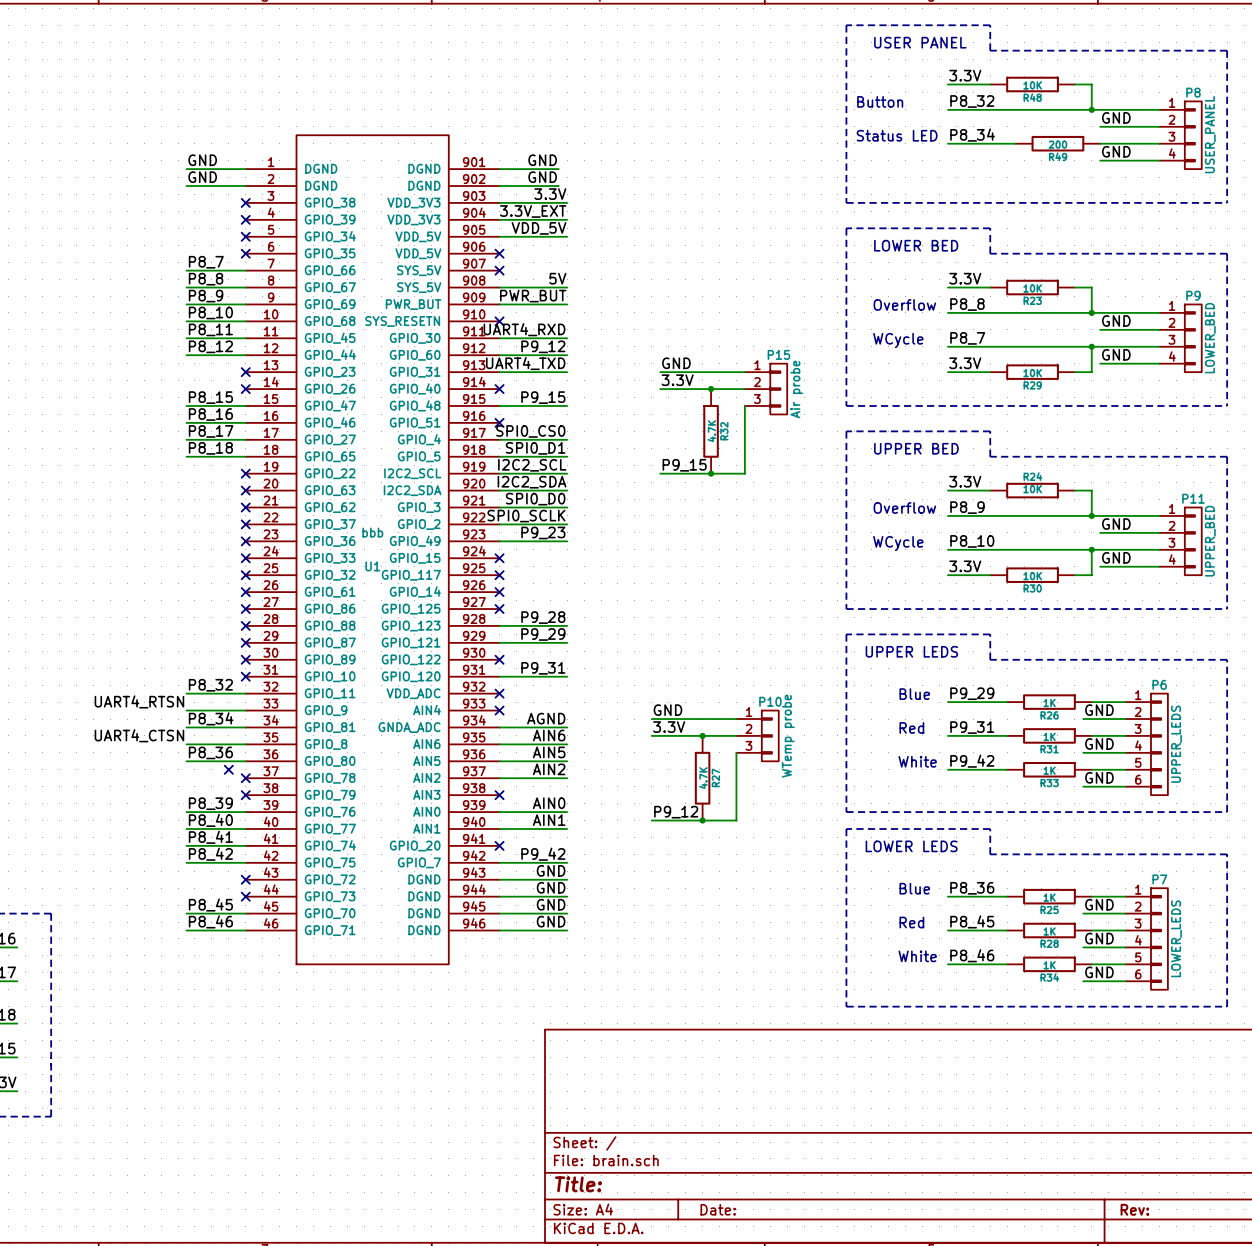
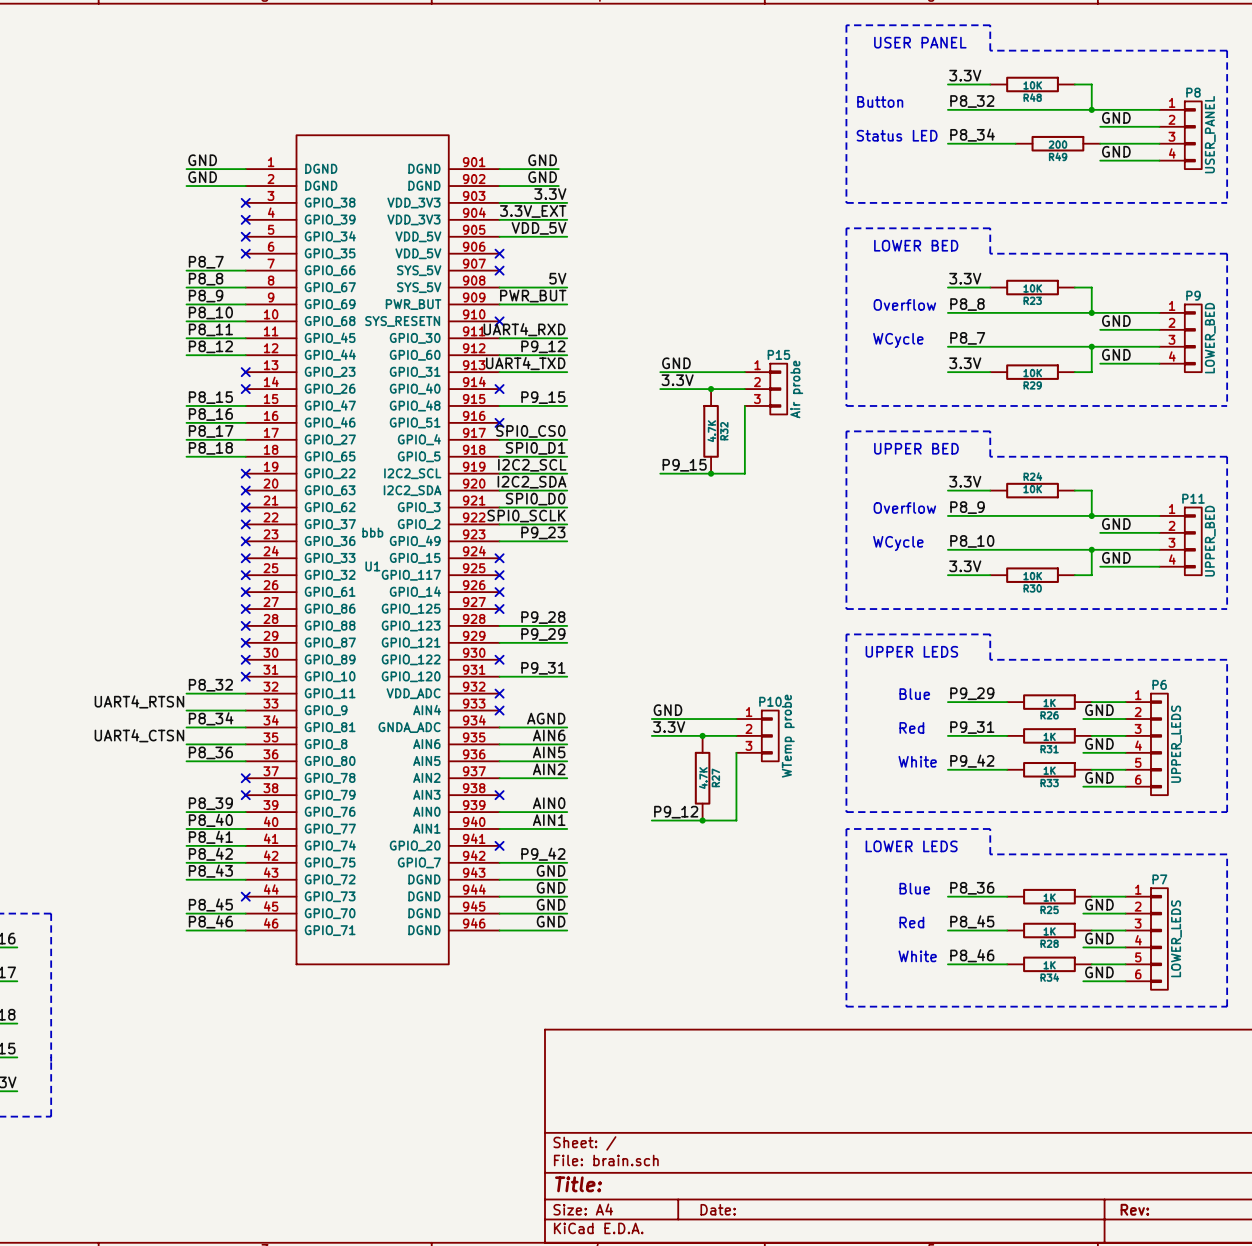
no-connect mark: (228, 769) -> none
label: none -> P8_43 (210, 871)
wire: none -> (186, 879) (245, 879)
no-connect mark: (245, 879) -> none

